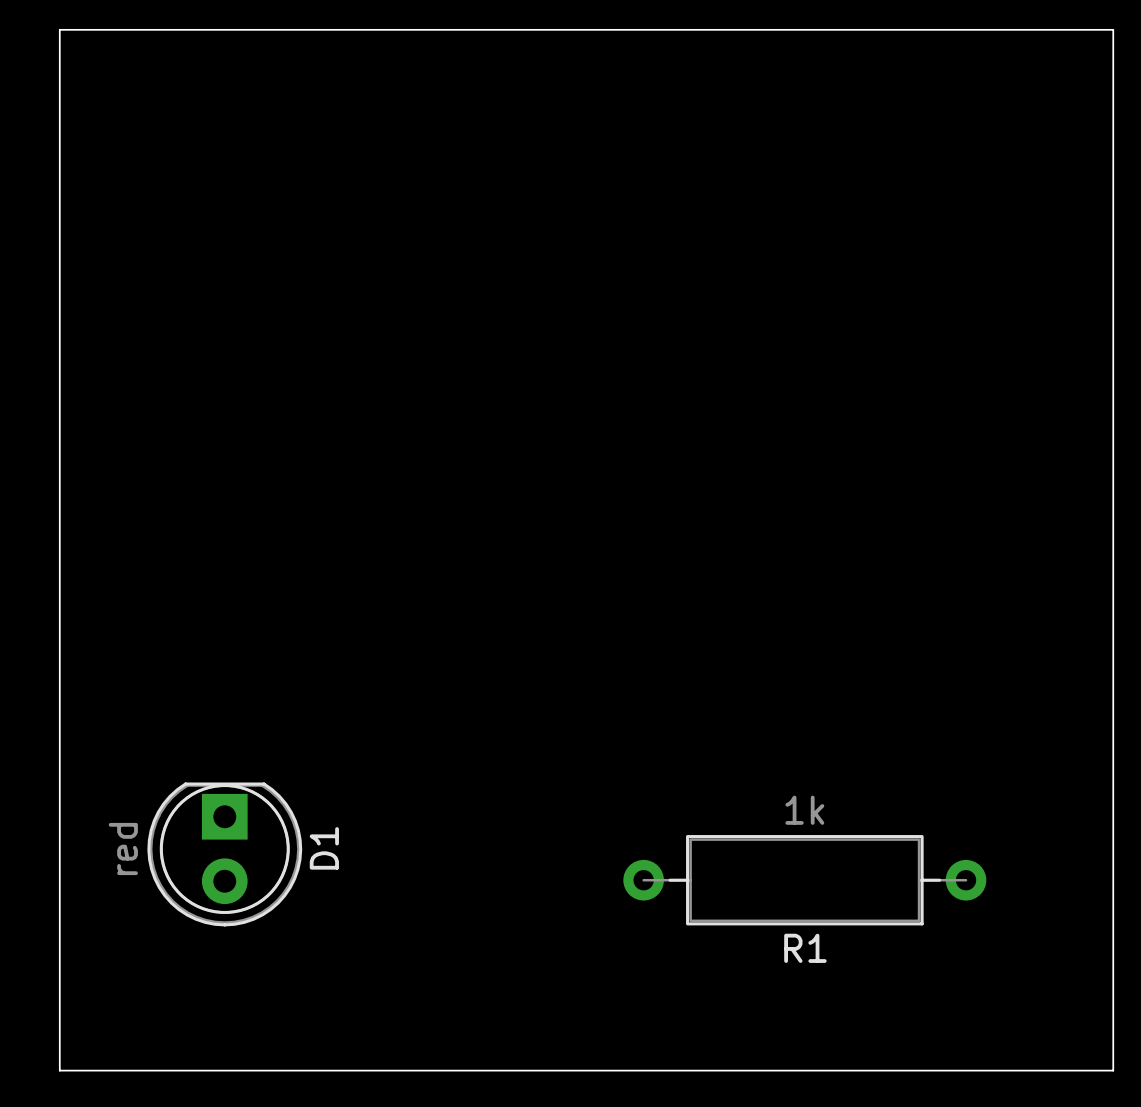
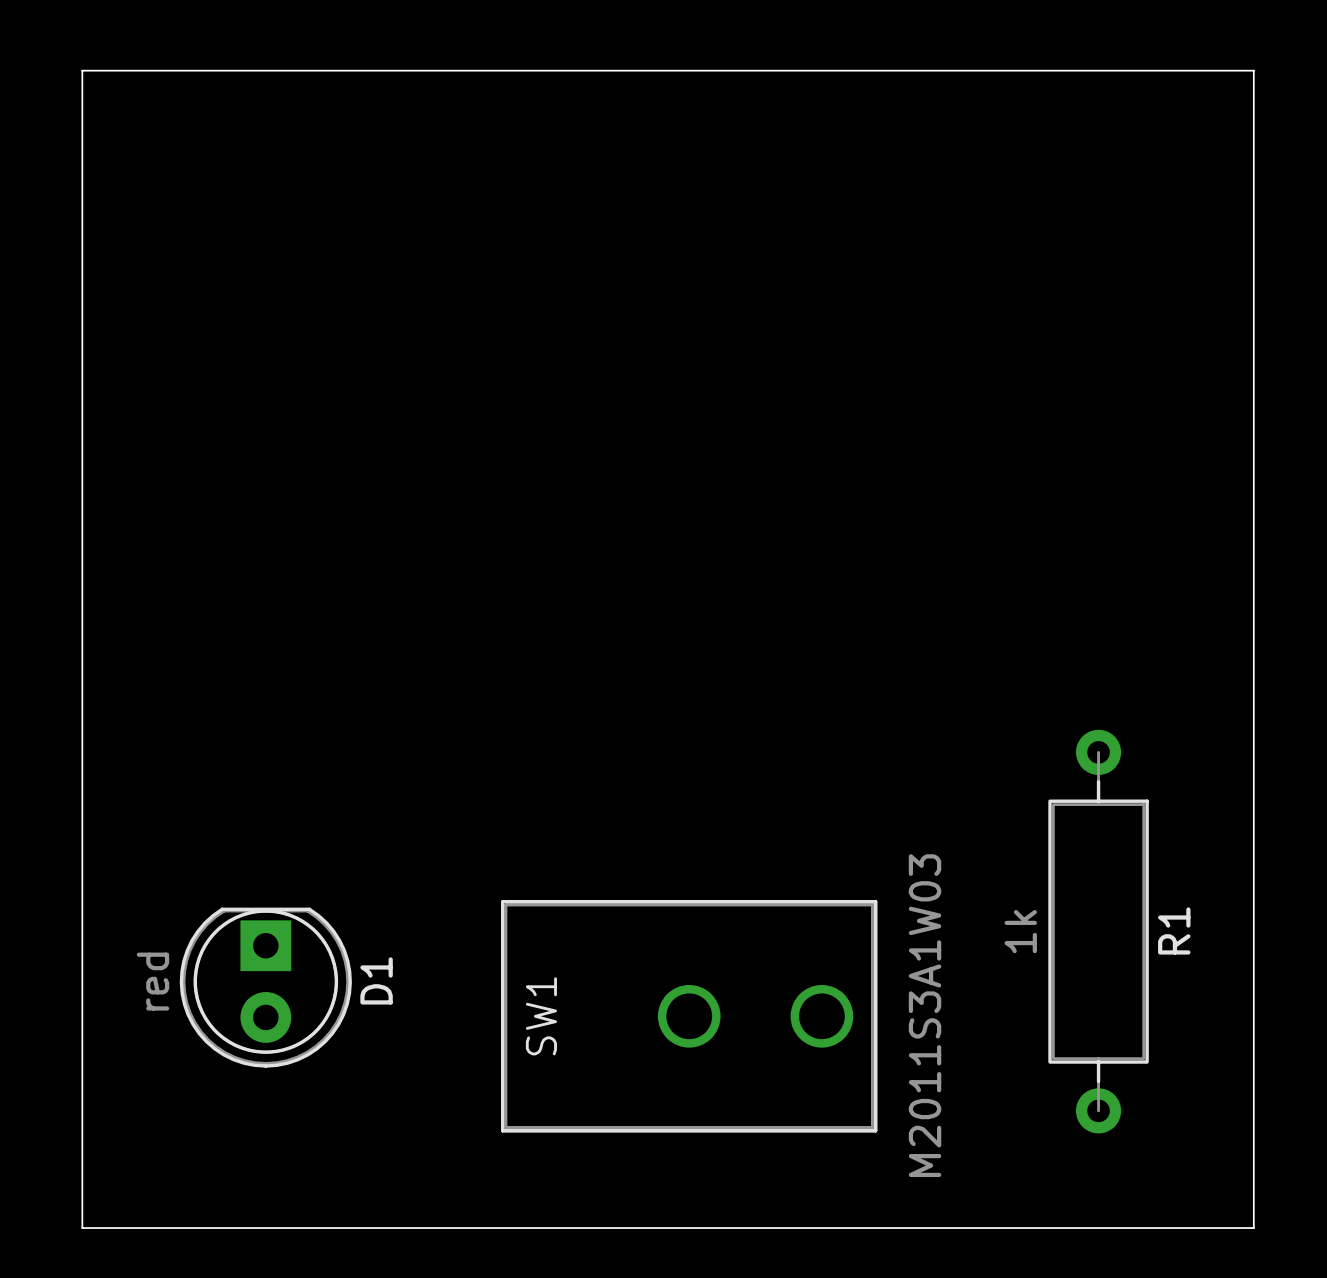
R1 value position: 1k (804, 810) -> 1k (1020, 931)
SW1: none -> M2011S3A1W03 (689, 1016)
R1 rotation: 0° (804, 880) -> 90° clockwise (1098, 931)
R1 name position: R1 (805, 948) -> R1 (1174, 930)

